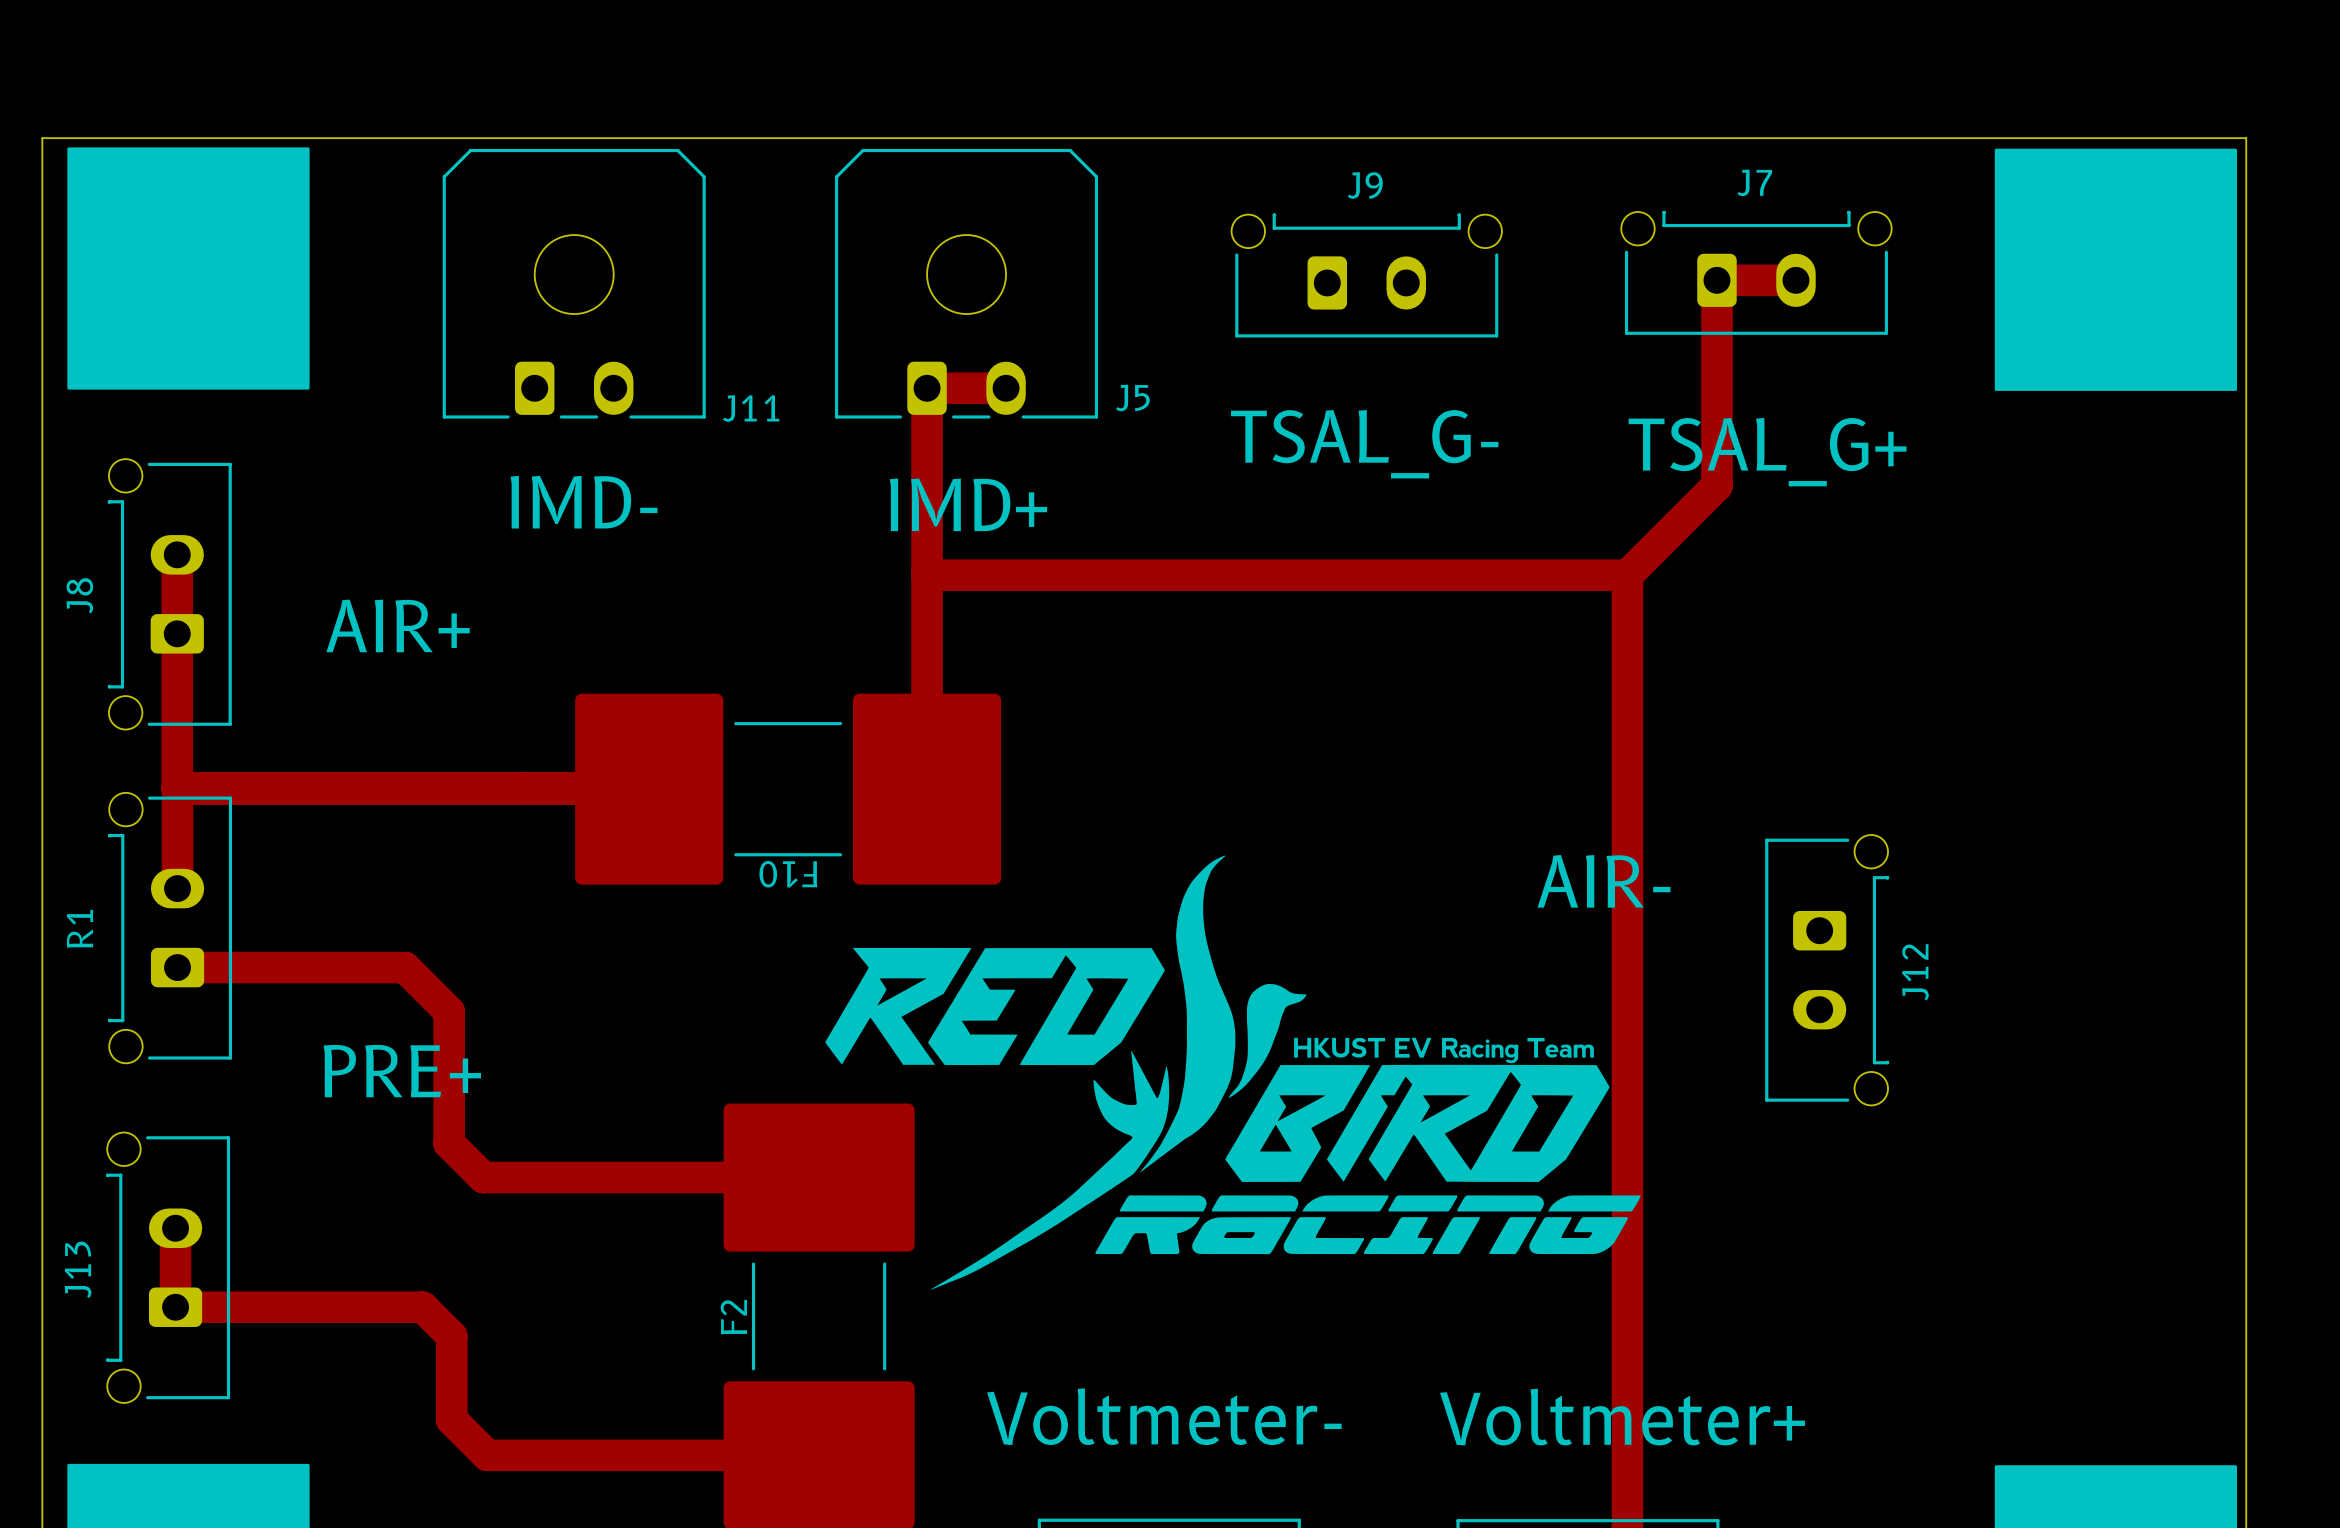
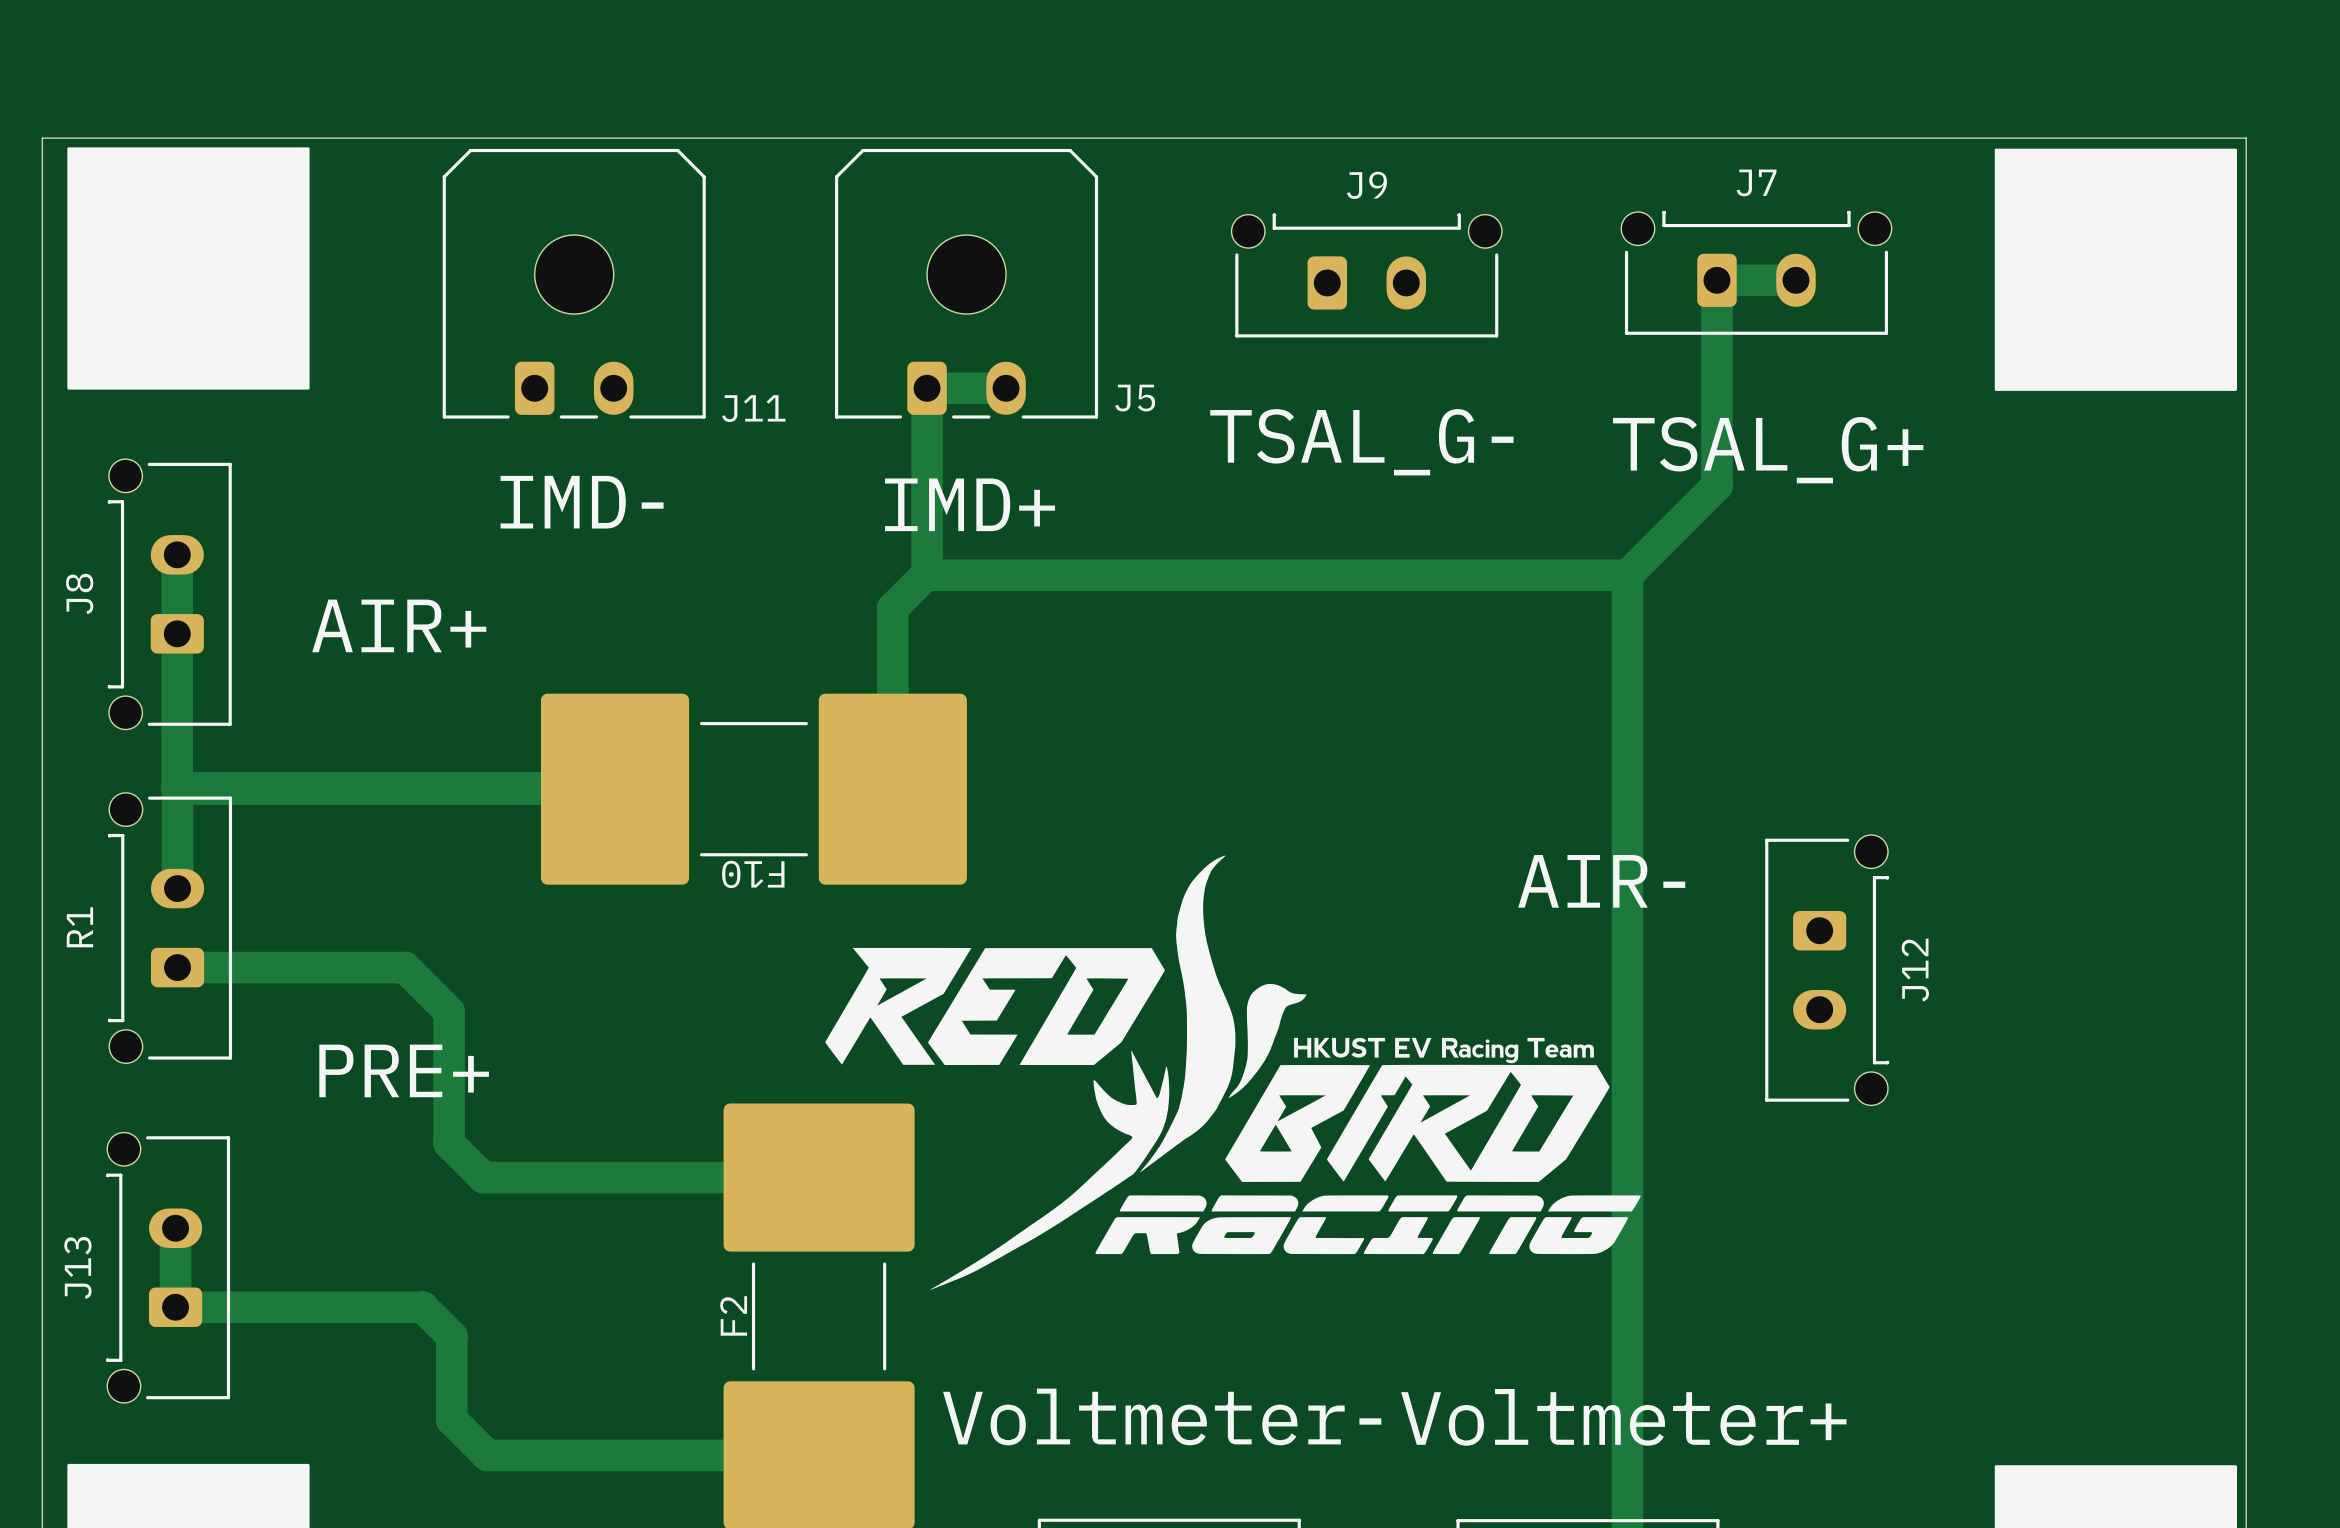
track: (927, 573) (927, 789) -> (927, 573) (892, 608) (892, 789)
F10 position: (788, 789) -> (753, 789)

